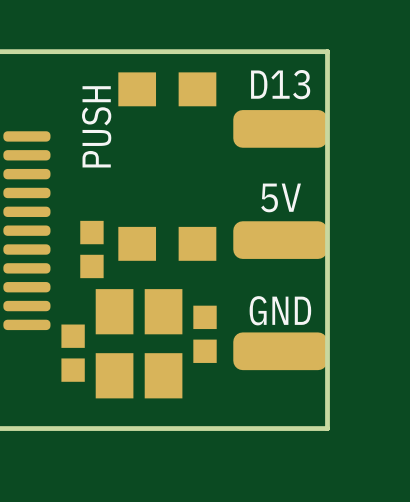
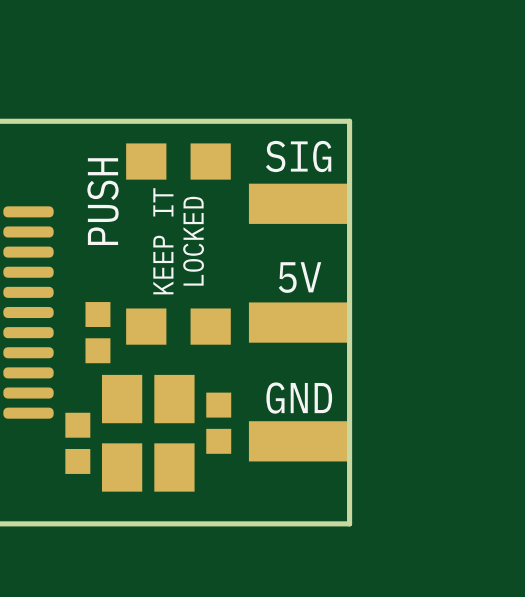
text: D13 (280, 84) -> SIG (298, 156)
part footprint: [233, 110, 328, 371] -> [248, 183, 350, 462]
text: none -> KEEP IT (163, 241)
text: none -> LOCKED (193, 241)

